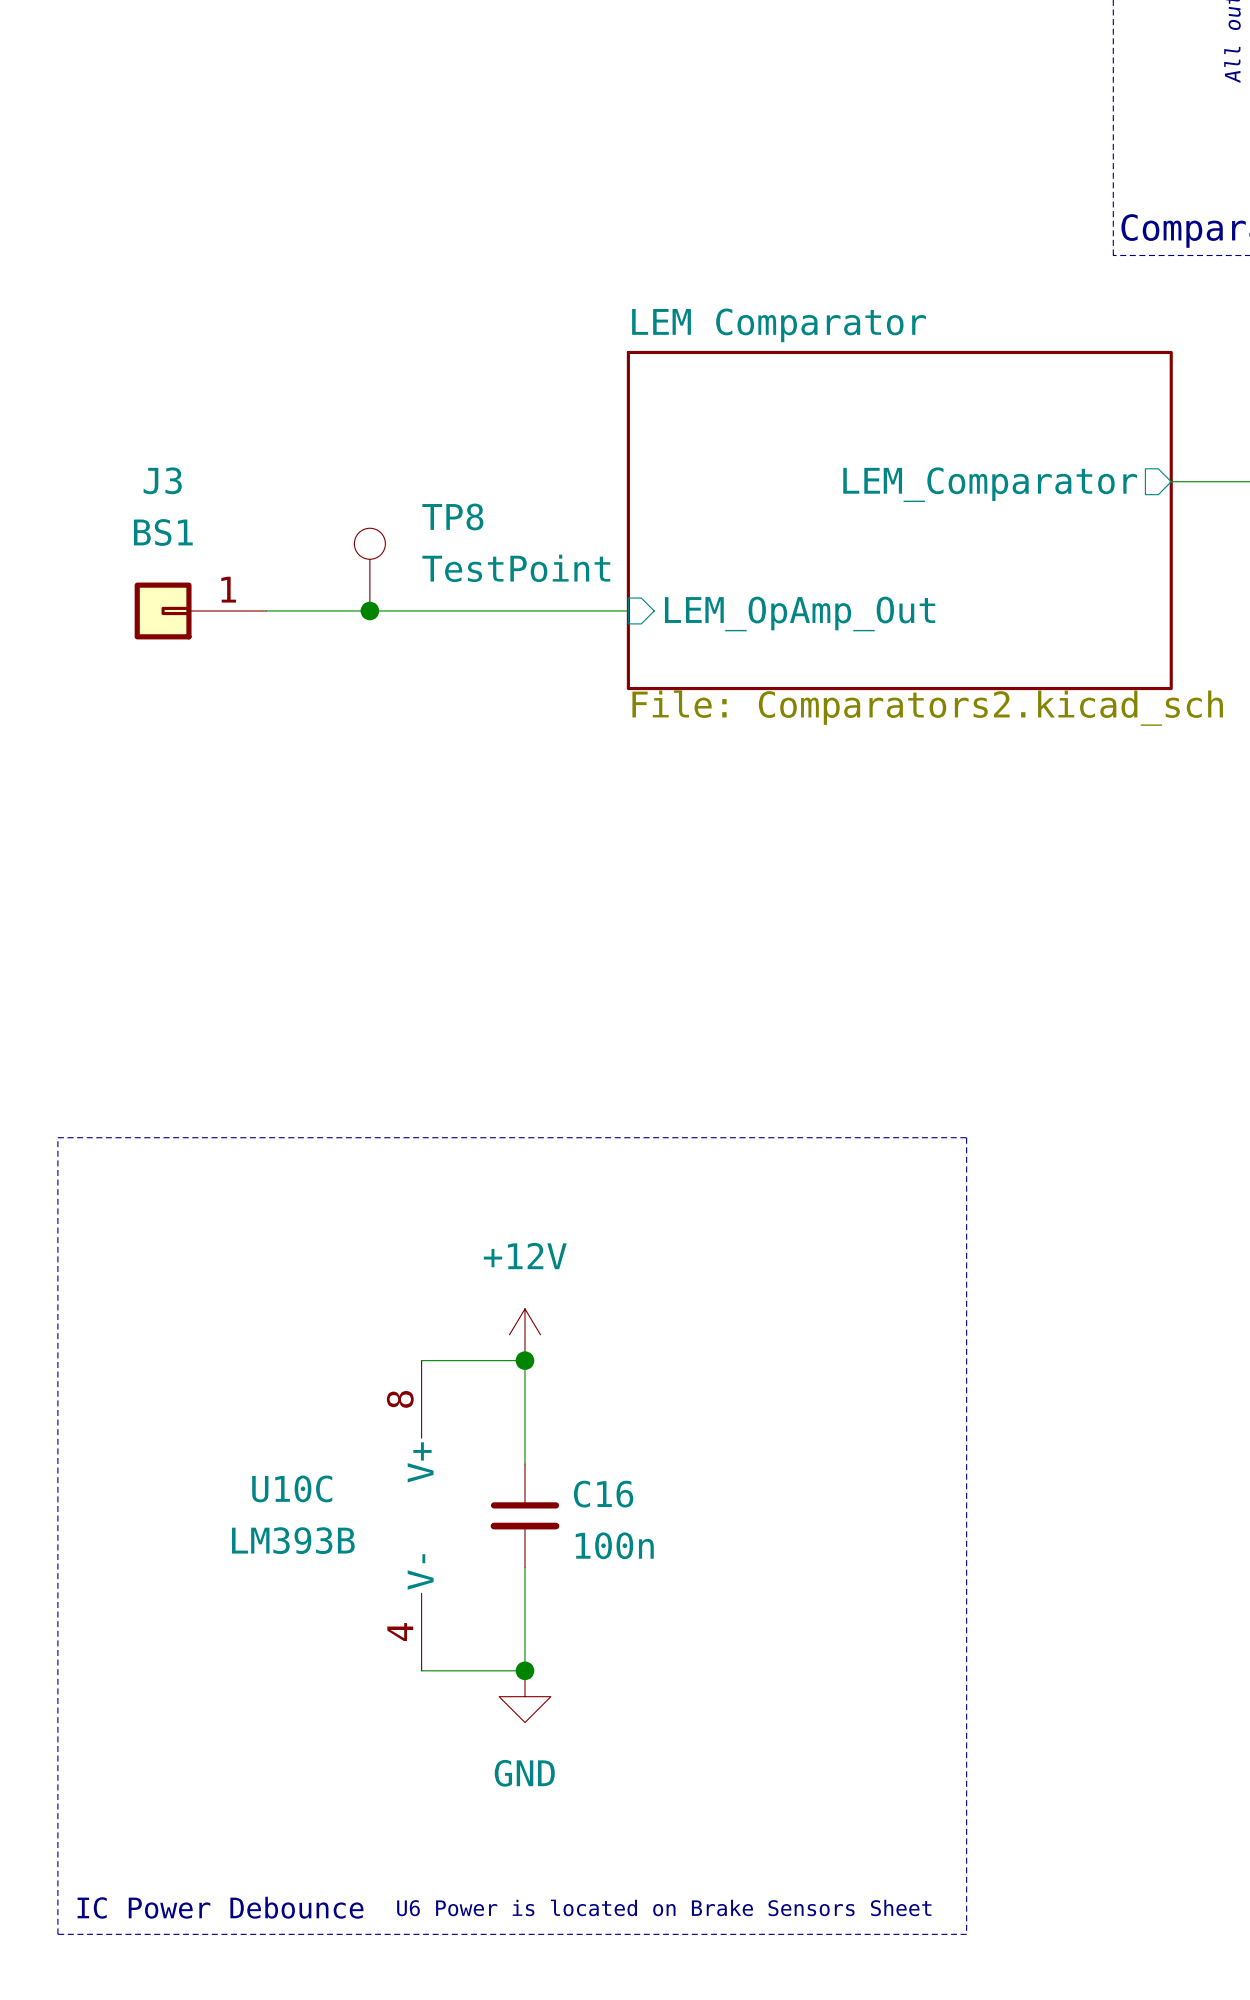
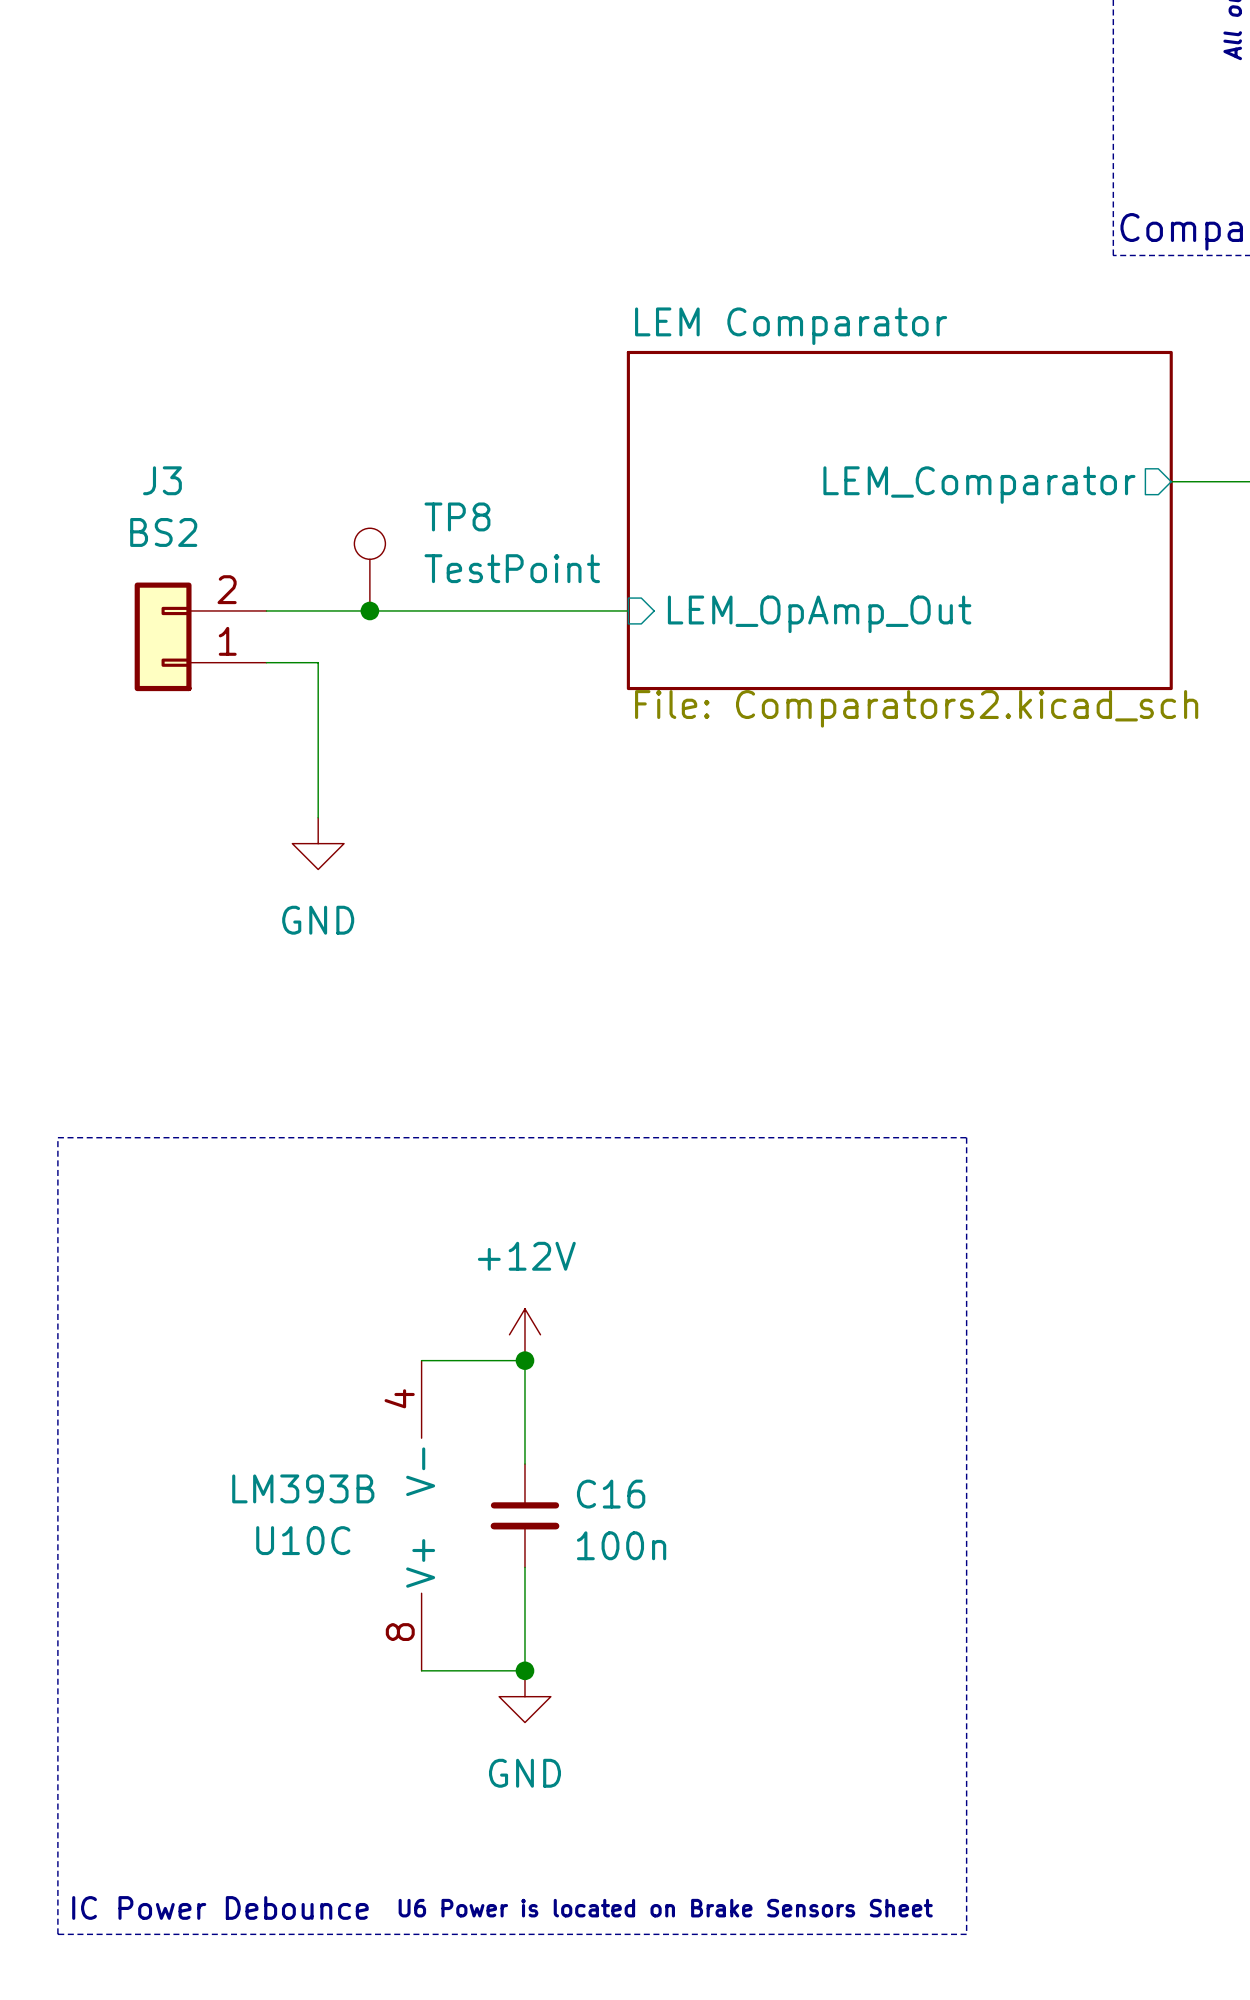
J3 value: BS1 (163, 532) -> BS2 (163, 532)
J3 symbol: [134, 582, 267, 640] -> [134, 582, 267, 692]
wire: none -> (266, 662) (318, 662) (318, 817)
power symbol: none -> GND (318, 843)
U10C name position: U10C (292, 1488) -> U10C (303, 1540)
U10C rotation: 0° (421, 1515) -> 180° (421, 1515)
U10C value position: LM393B (293, 1540) -> LM393B (303, 1488)

